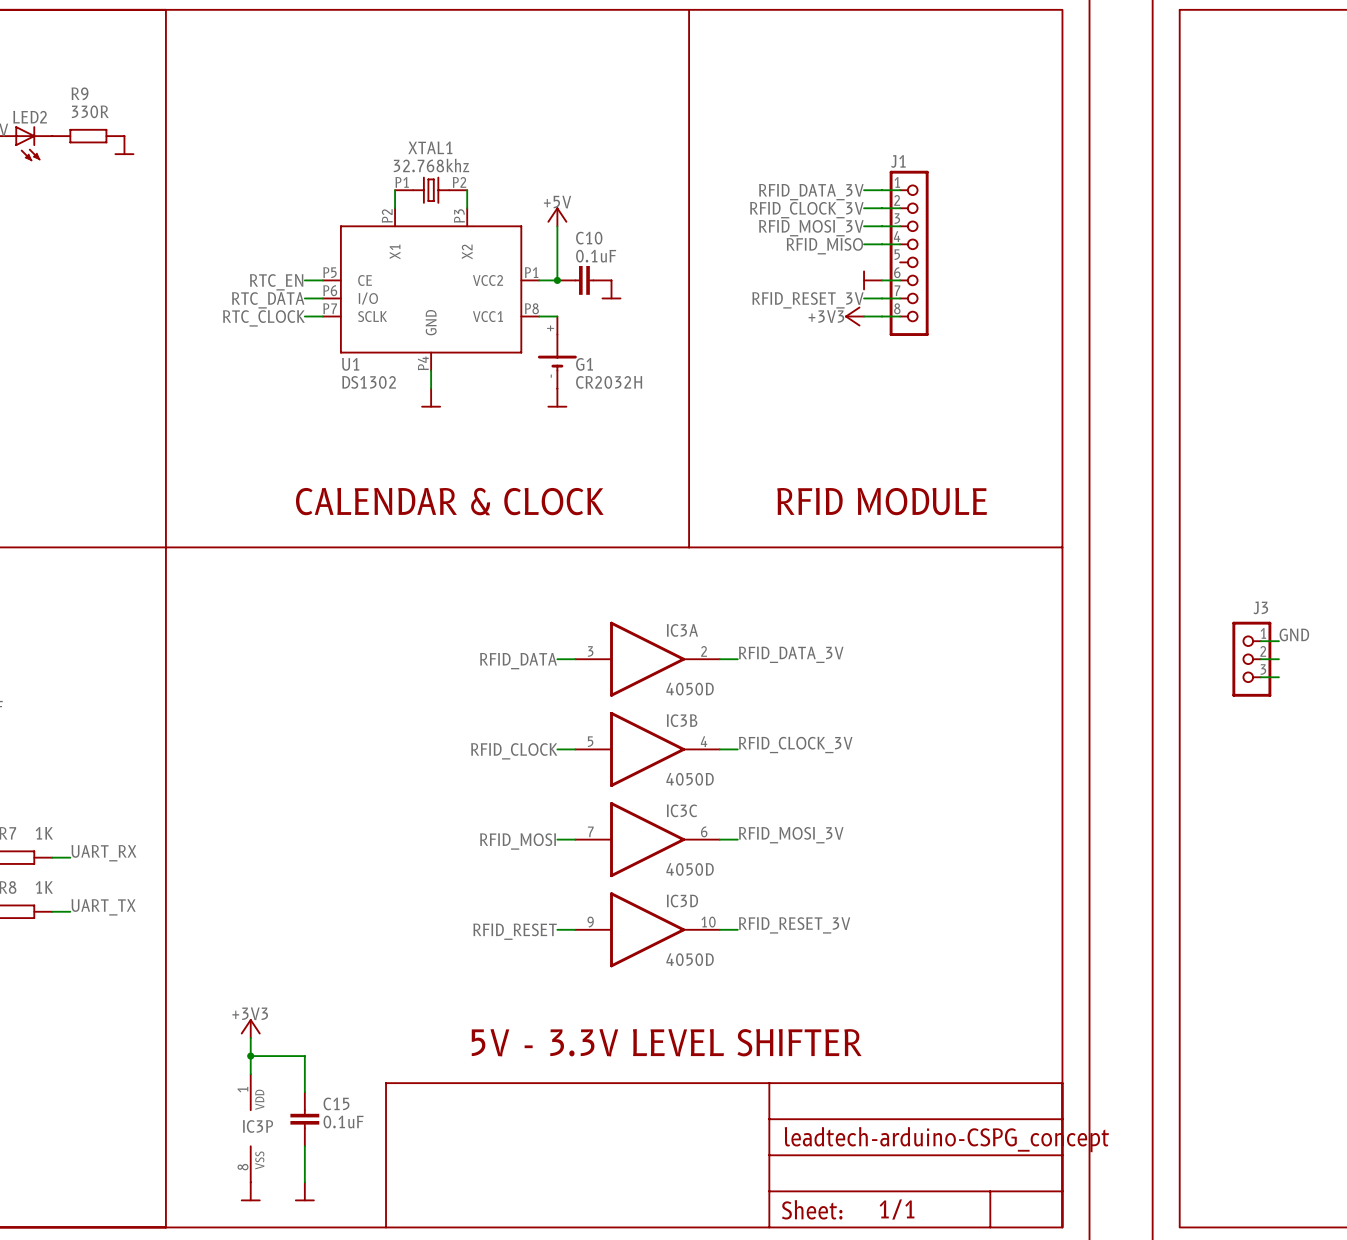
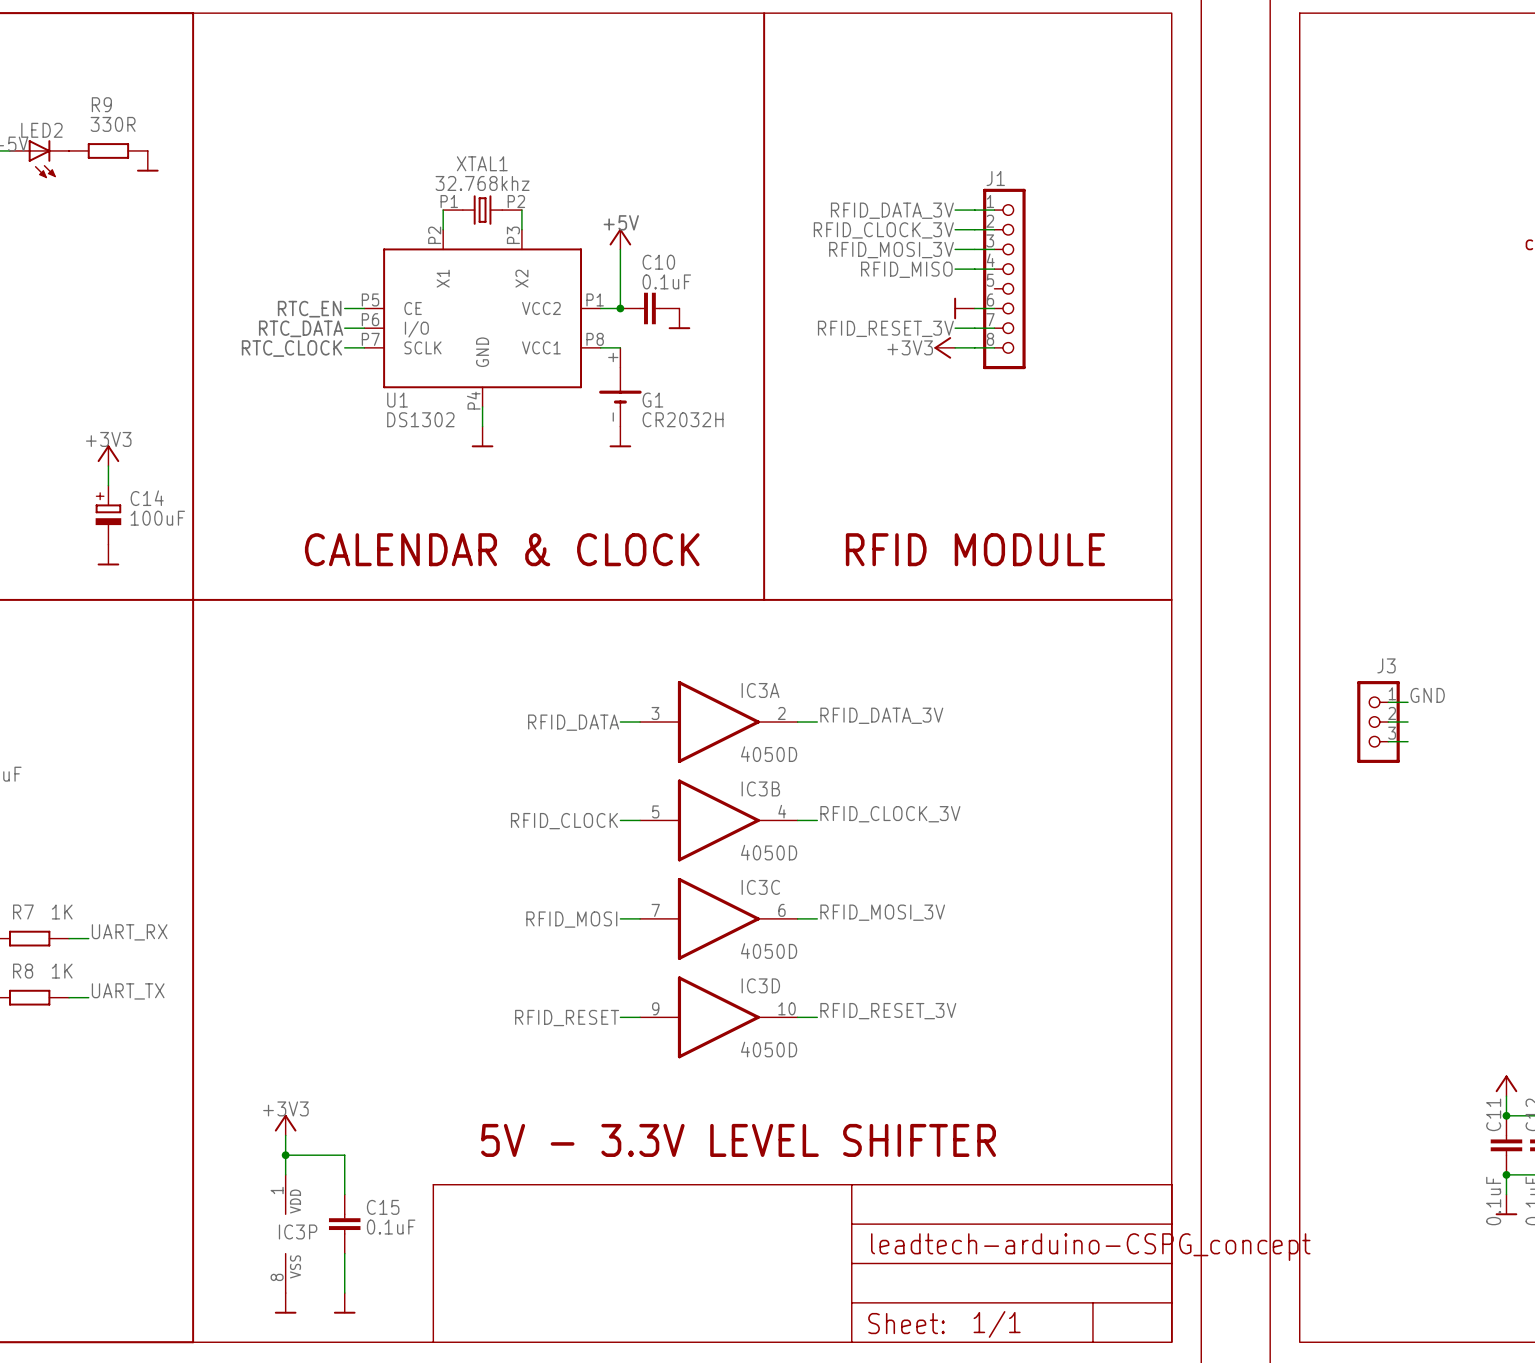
label: none -> +3V3 (108, 439)
power symbol: none -> (108, 455)
wire: none -> (108, 466) (108, 485)
C14: none -> 100uF (108, 515)
power symbol: none -> (108, 555)

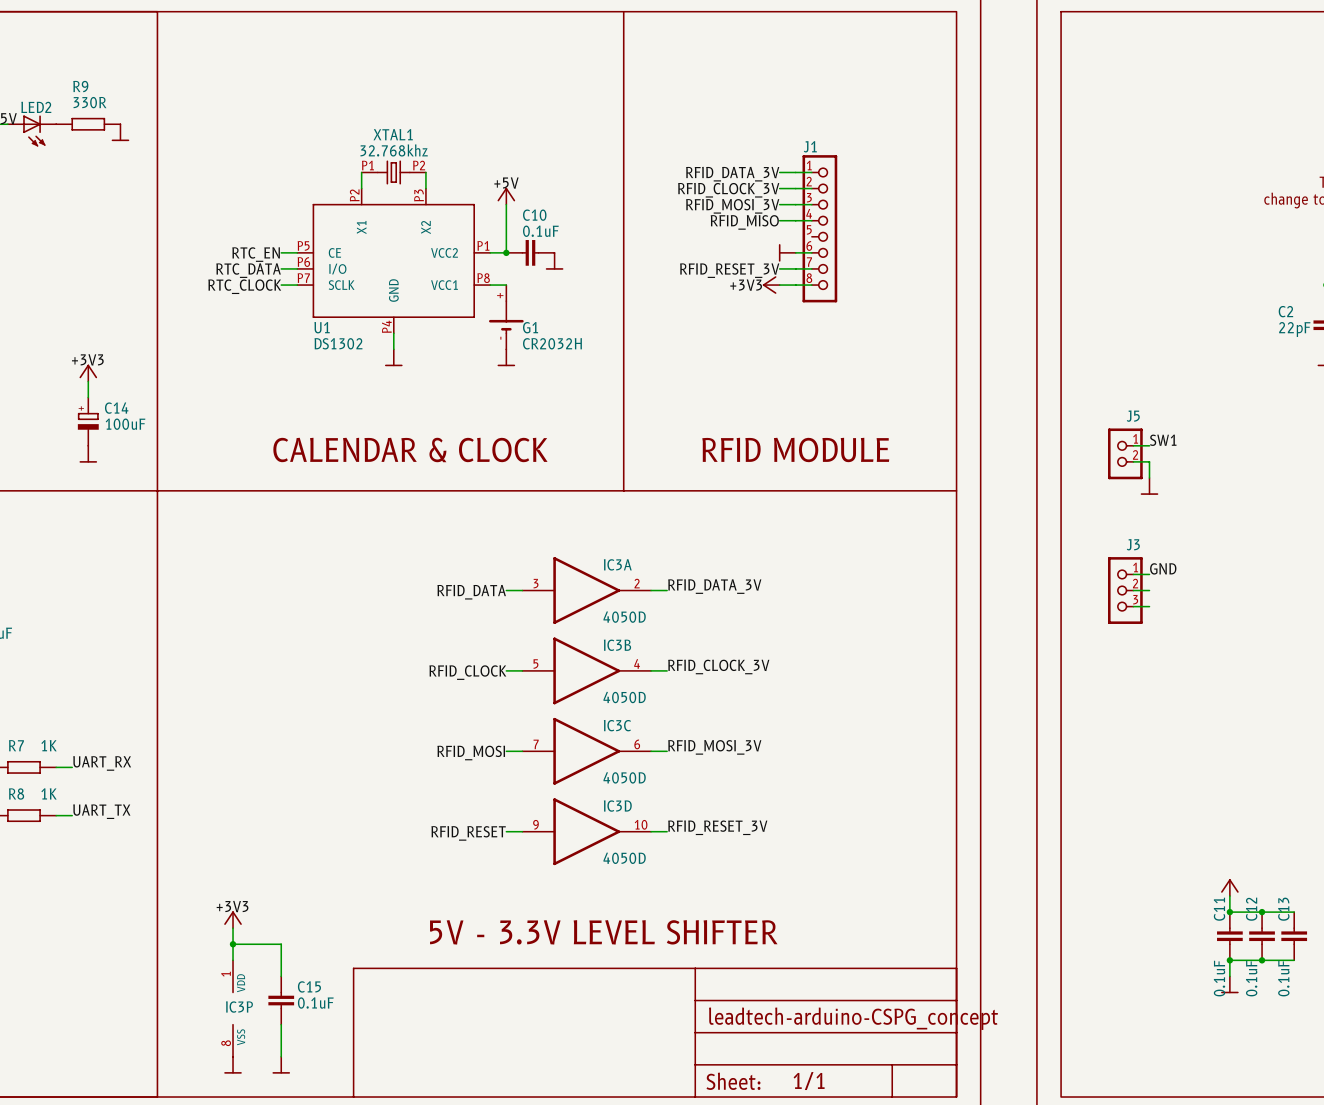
label: none -> SW1 (1163, 440)
wire: none -> (1133, 445) (1149, 445)
J5: none -> (1125, 453)
wire: none -> (1133, 461) (1149, 461) (1149, 477)
power symbol: none -> (1149, 486)

